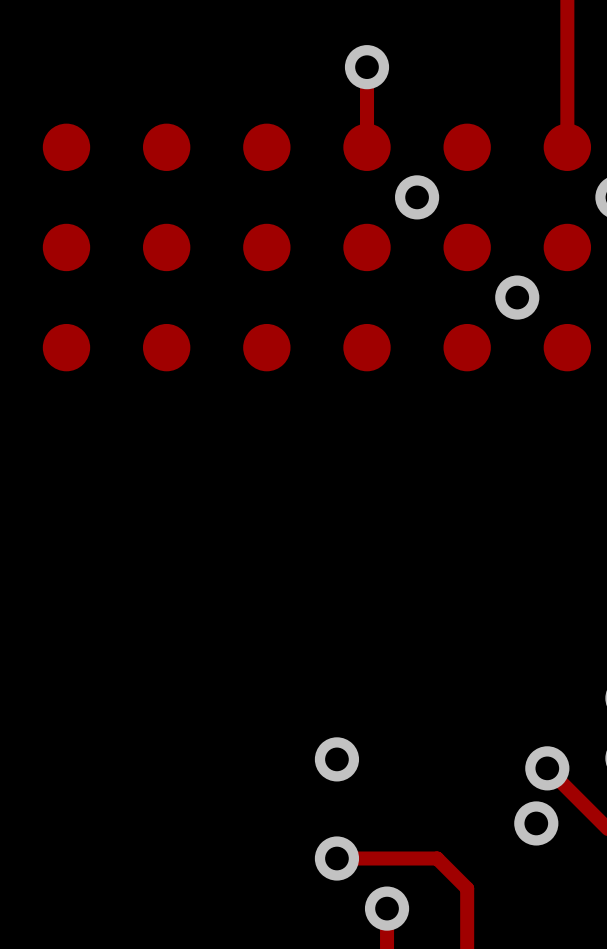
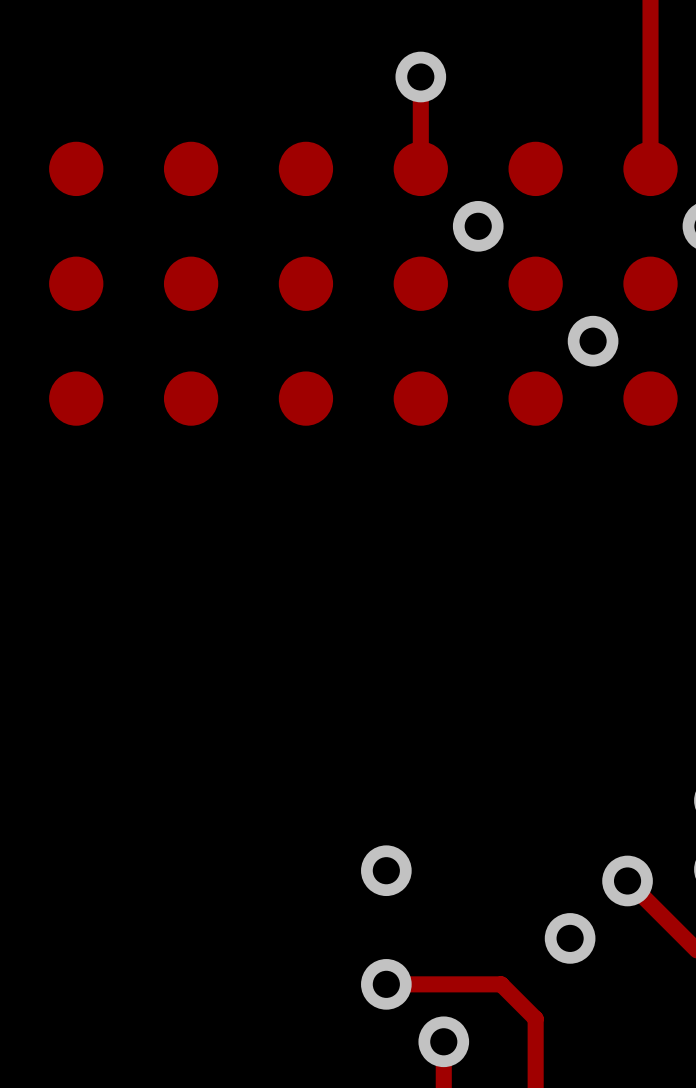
via position: (536, 823) -> (570, 938)

